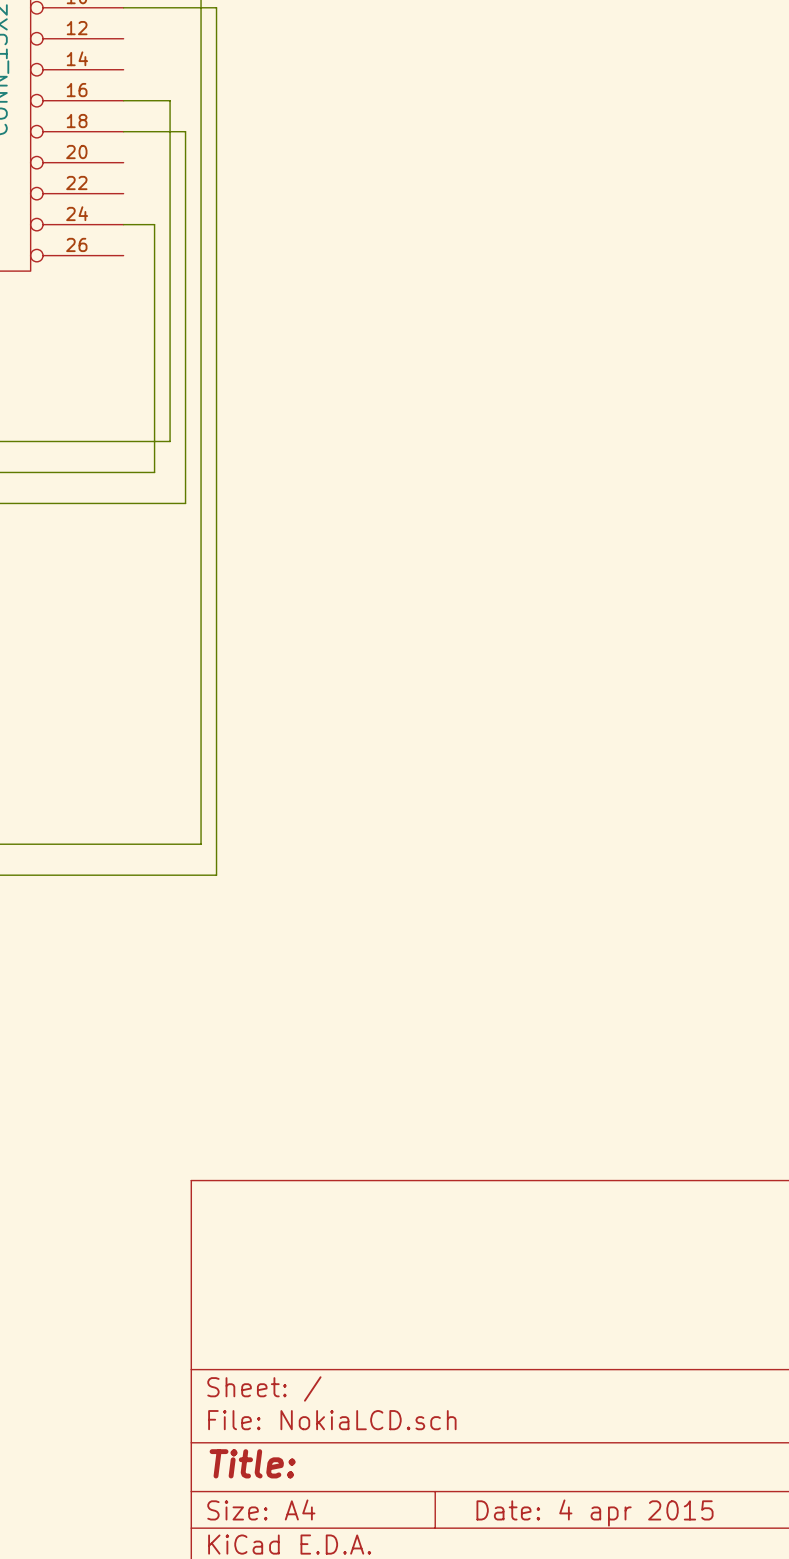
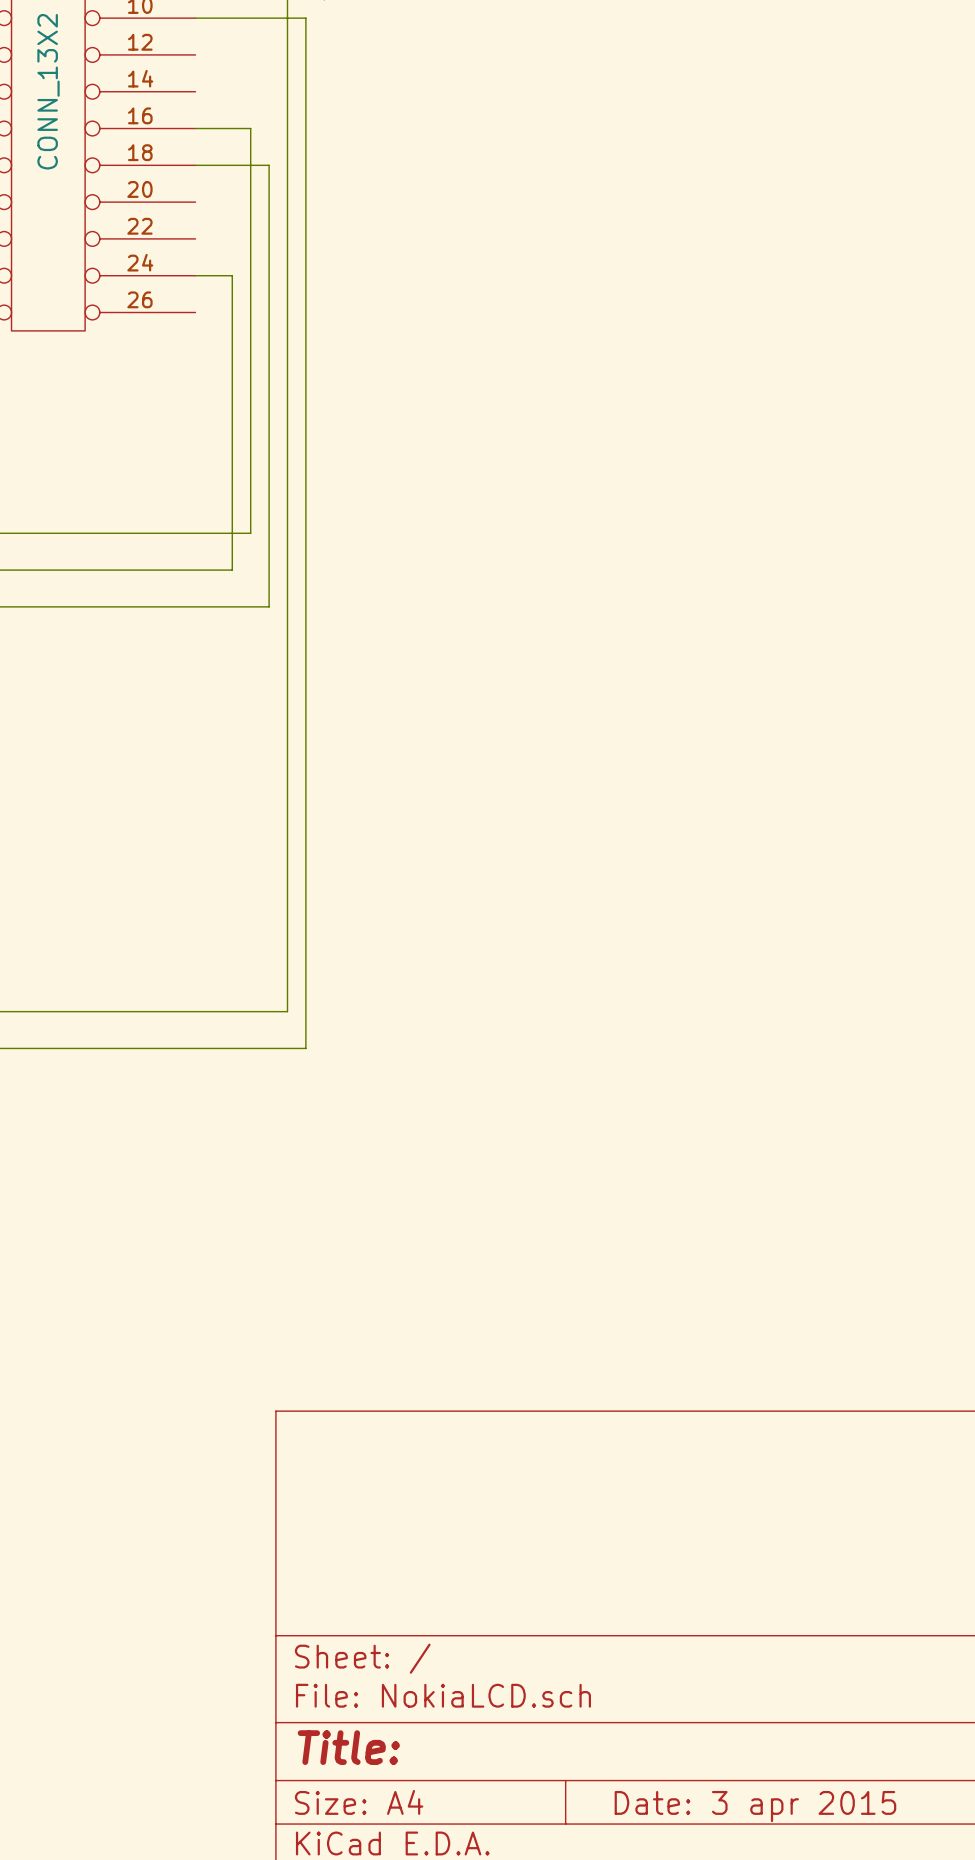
title block: Date: 4 apr 2015 (595, 1513) -> Date: 3 apr 2015 (755, 1806)

